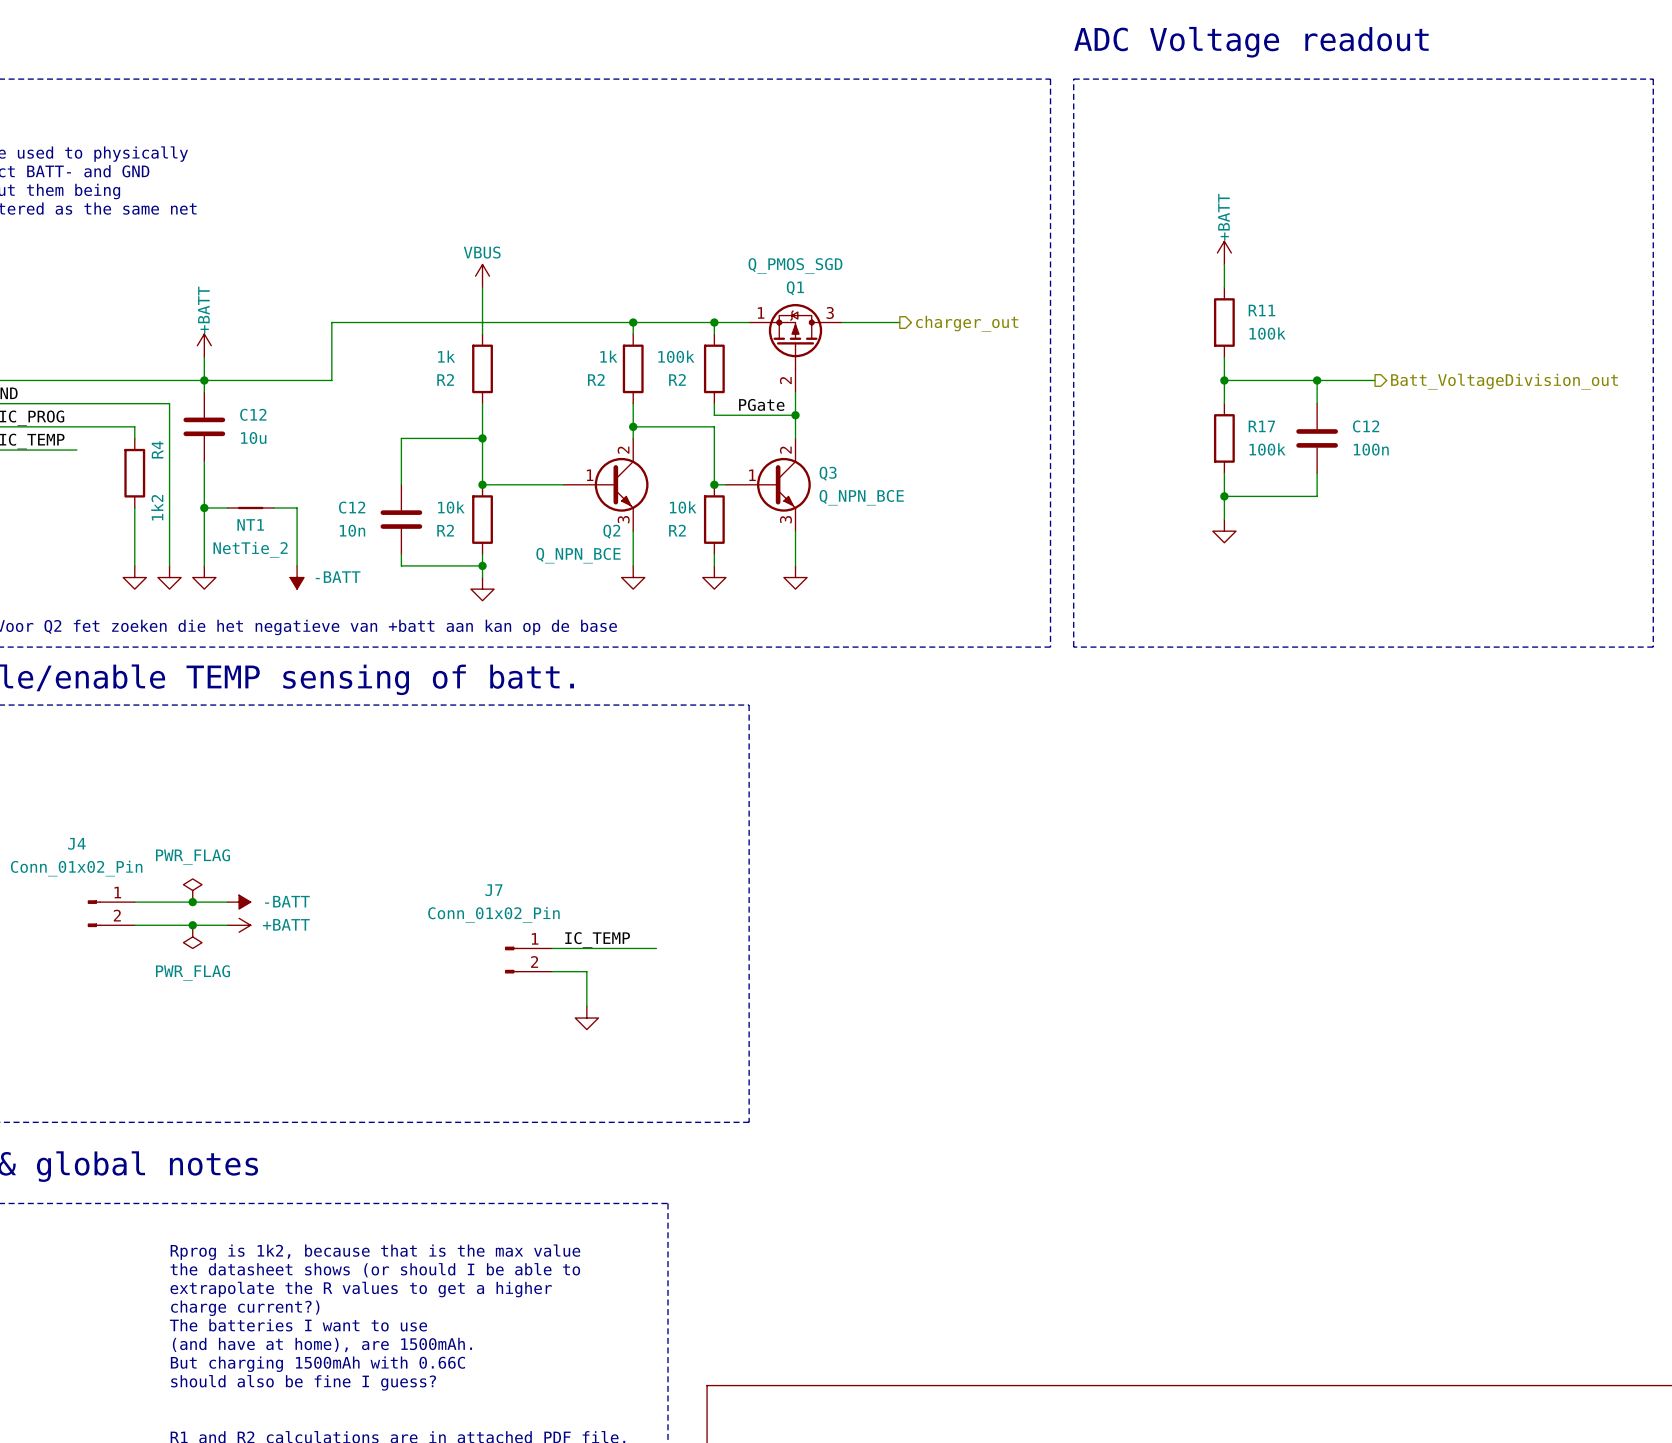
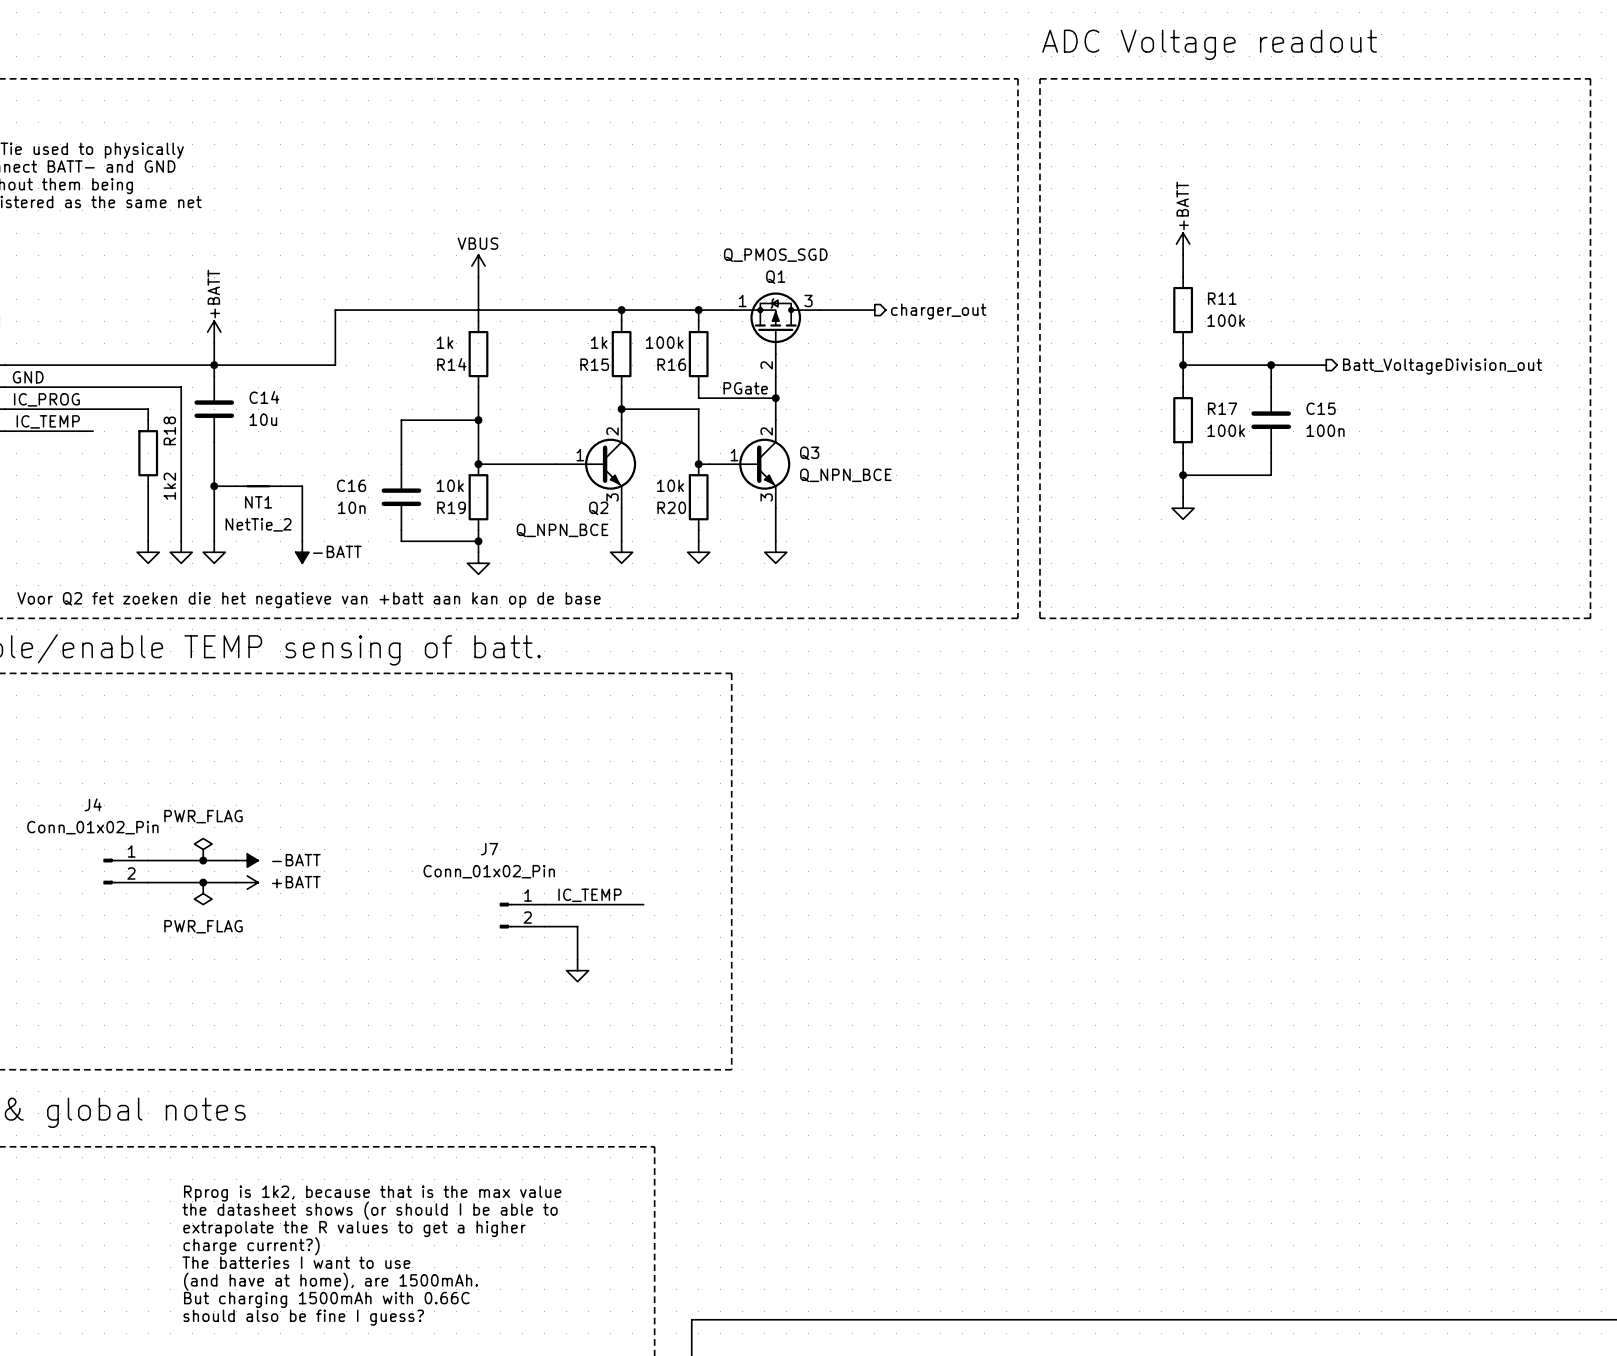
R2 name: R2 (445, 379) -> R14 (451, 364)
R2 name: R2 (596, 379) -> R15 (594, 364)
R2 name: R2 (677, 379) -> R16 (671, 364)
C12 name: C12 (253, 414) -> C14 (264, 397)
C12 name: C12 (1366, 426) -> C15 (1321, 408)
R4 name: R4 (157, 449) -> R18 (169, 430)
C12 name: C12 (352, 507) -> C16 (351, 485)
R2 name: R2 (445, 530) -> R19 (451, 507)
R2 name: R2 (677, 530) -> R20 (671, 507)

